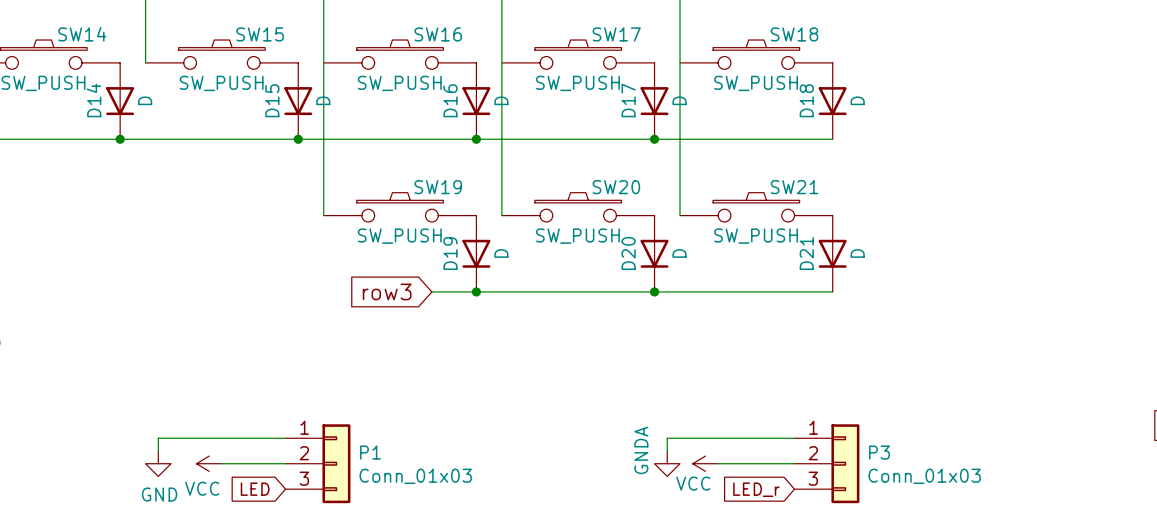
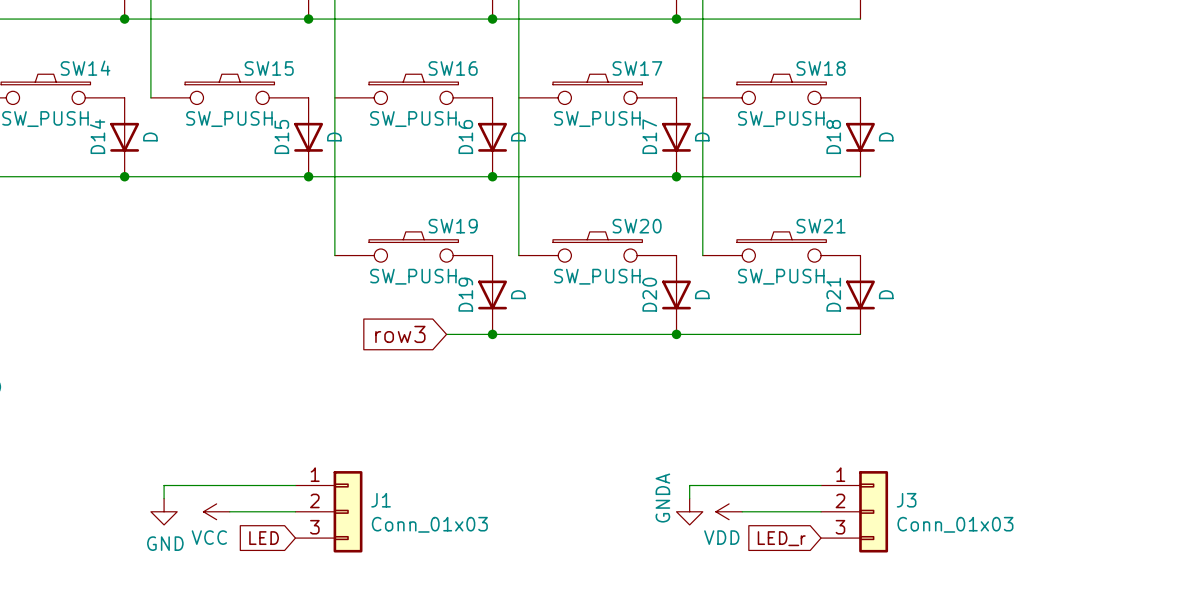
P1 name: P1 (370, 452) -> J1 (381, 500)
P3 name: P3 (879, 452) -> J3 (906, 500)
power symbol: VCC (705, 463) -> VDD (729, 511)

